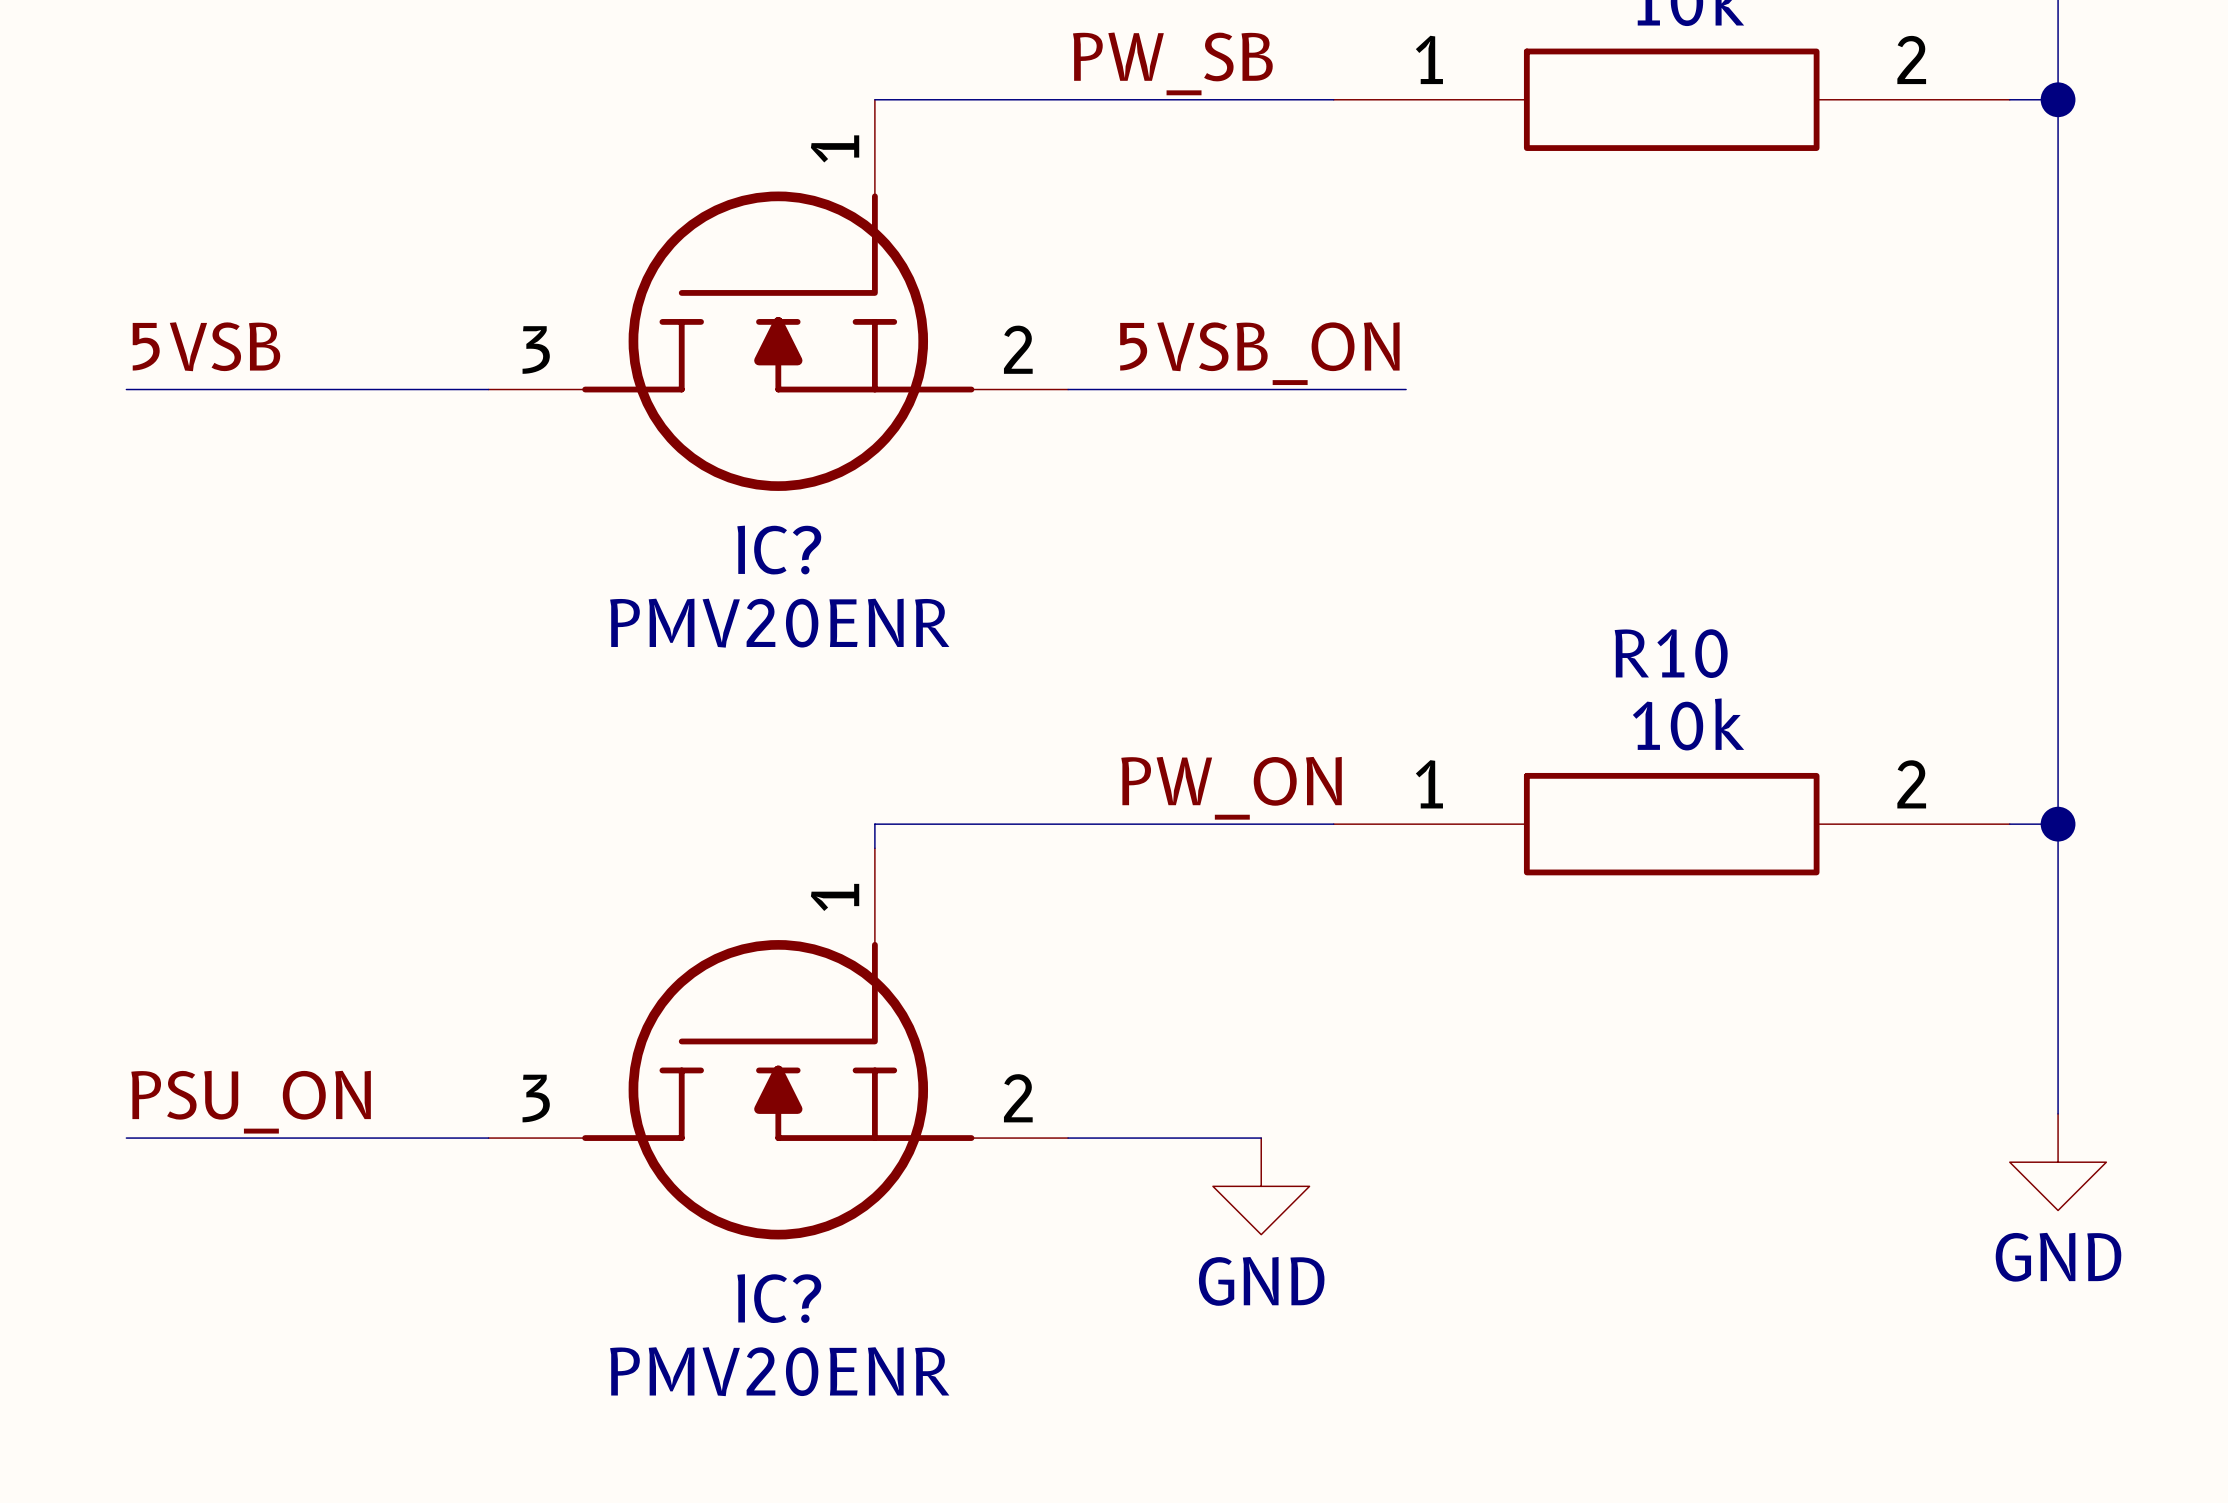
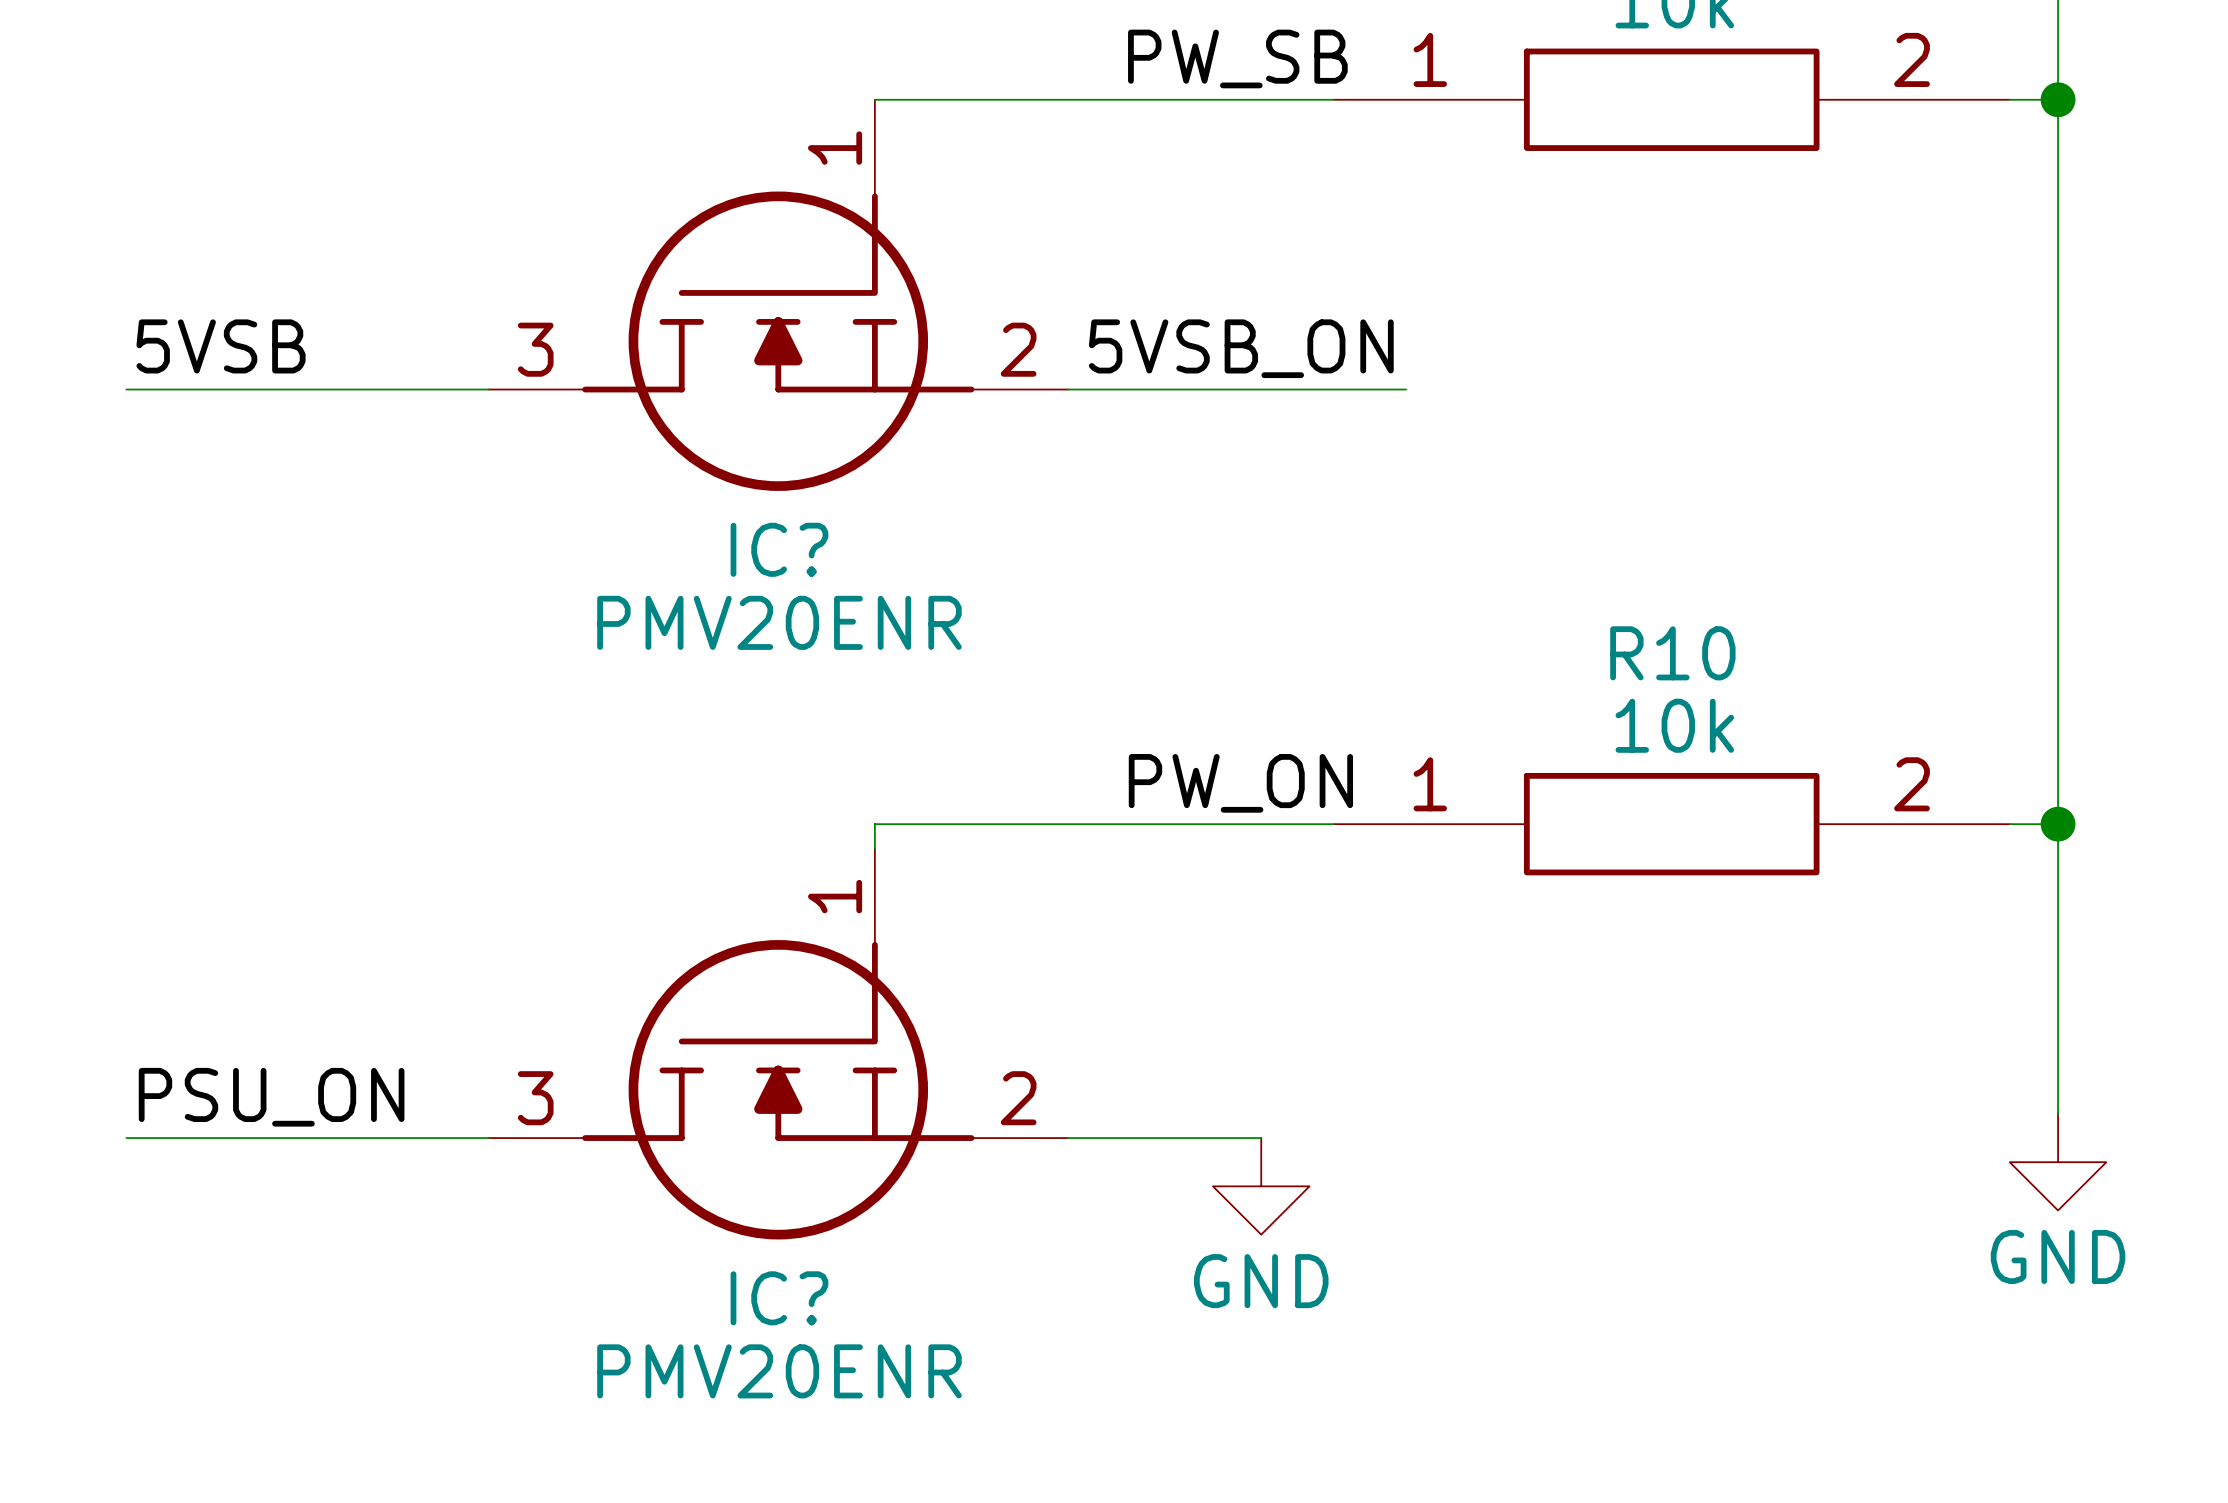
label position: PW_SB (1172, 63) -> PW_SB (1237, 58)

